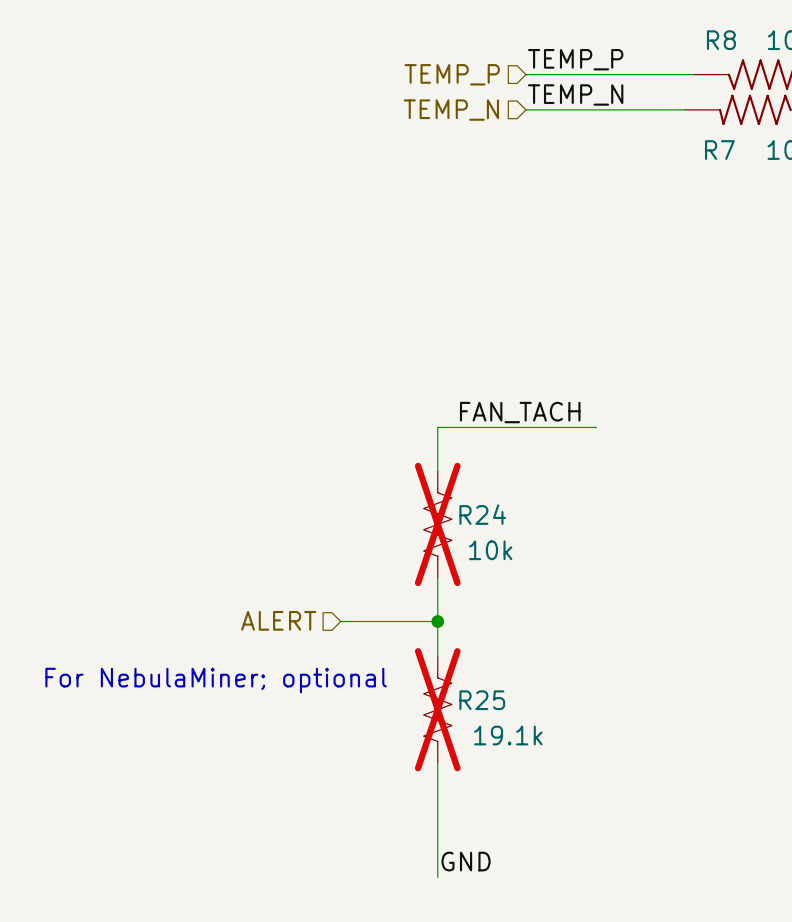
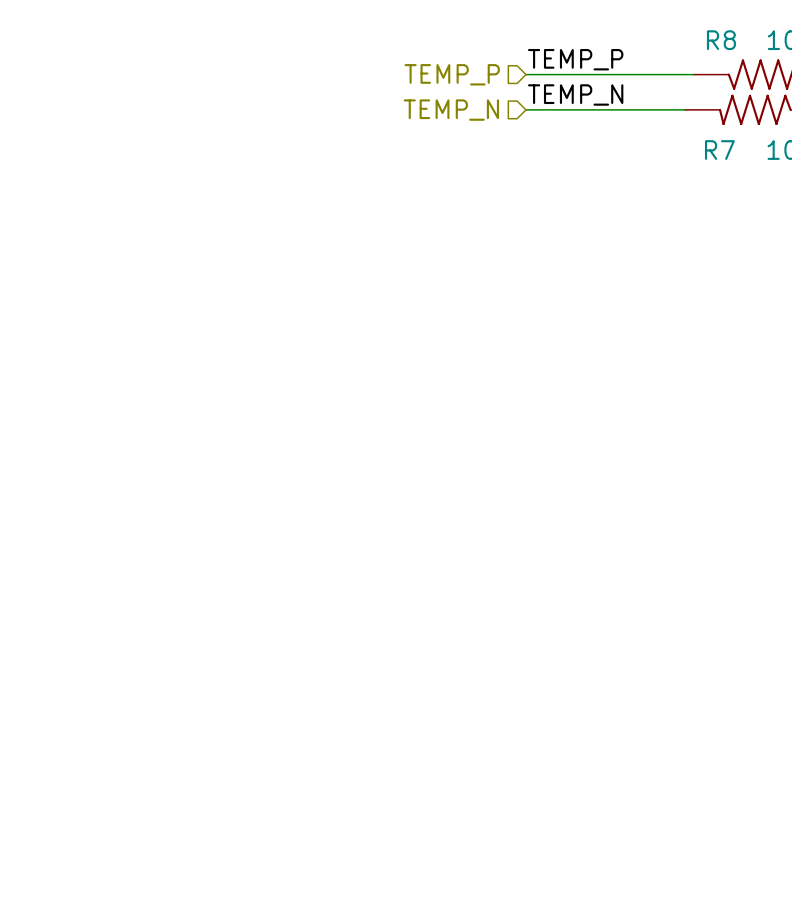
label: FAN_TACH (520, 412) -> none
wire: (596, 427) (437, 427) (437, 471) -> none
R24: 10k (437, 524) -> none
wire: (437, 577) (437, 656) -> none
hierarchical label: ALERT (278, 620) -> none
wire: (340, 621) (437, 621) -> none
junction: (437, 621) -> none
text: For NebulaMiner; optional (216, 680) -> none
R25: 19.1k (437, 709) -> none
wire: (437, 762) (437, 877) -> none
label: GND (466, 861) -> none

